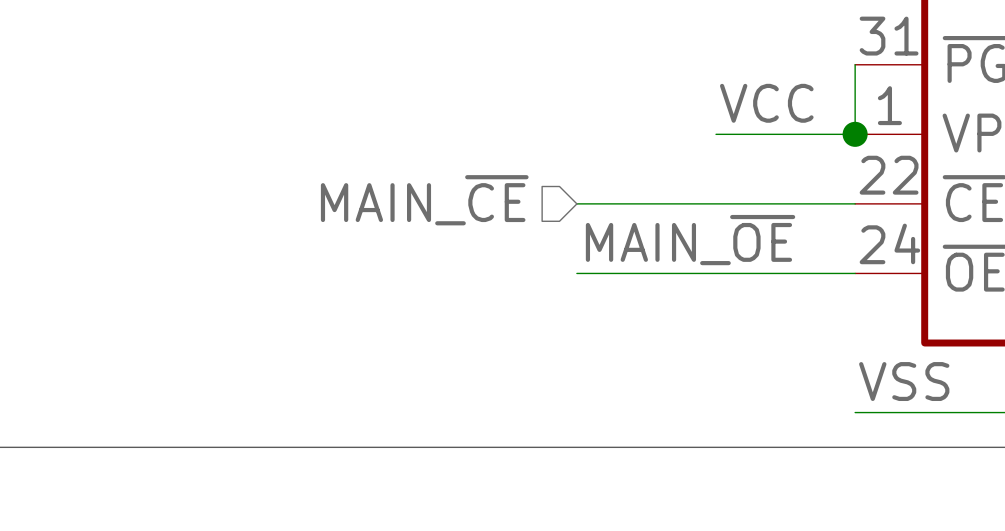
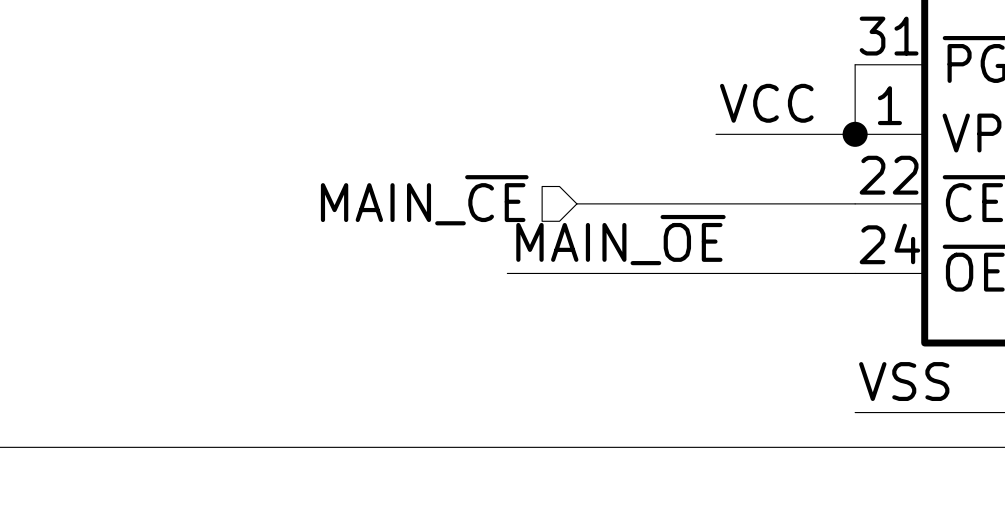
label position: MAIN_~{OE} (690, 240) -> MAIN_~{OE} (620, 240)
wire: none -> (507, 273) (576, 273)

